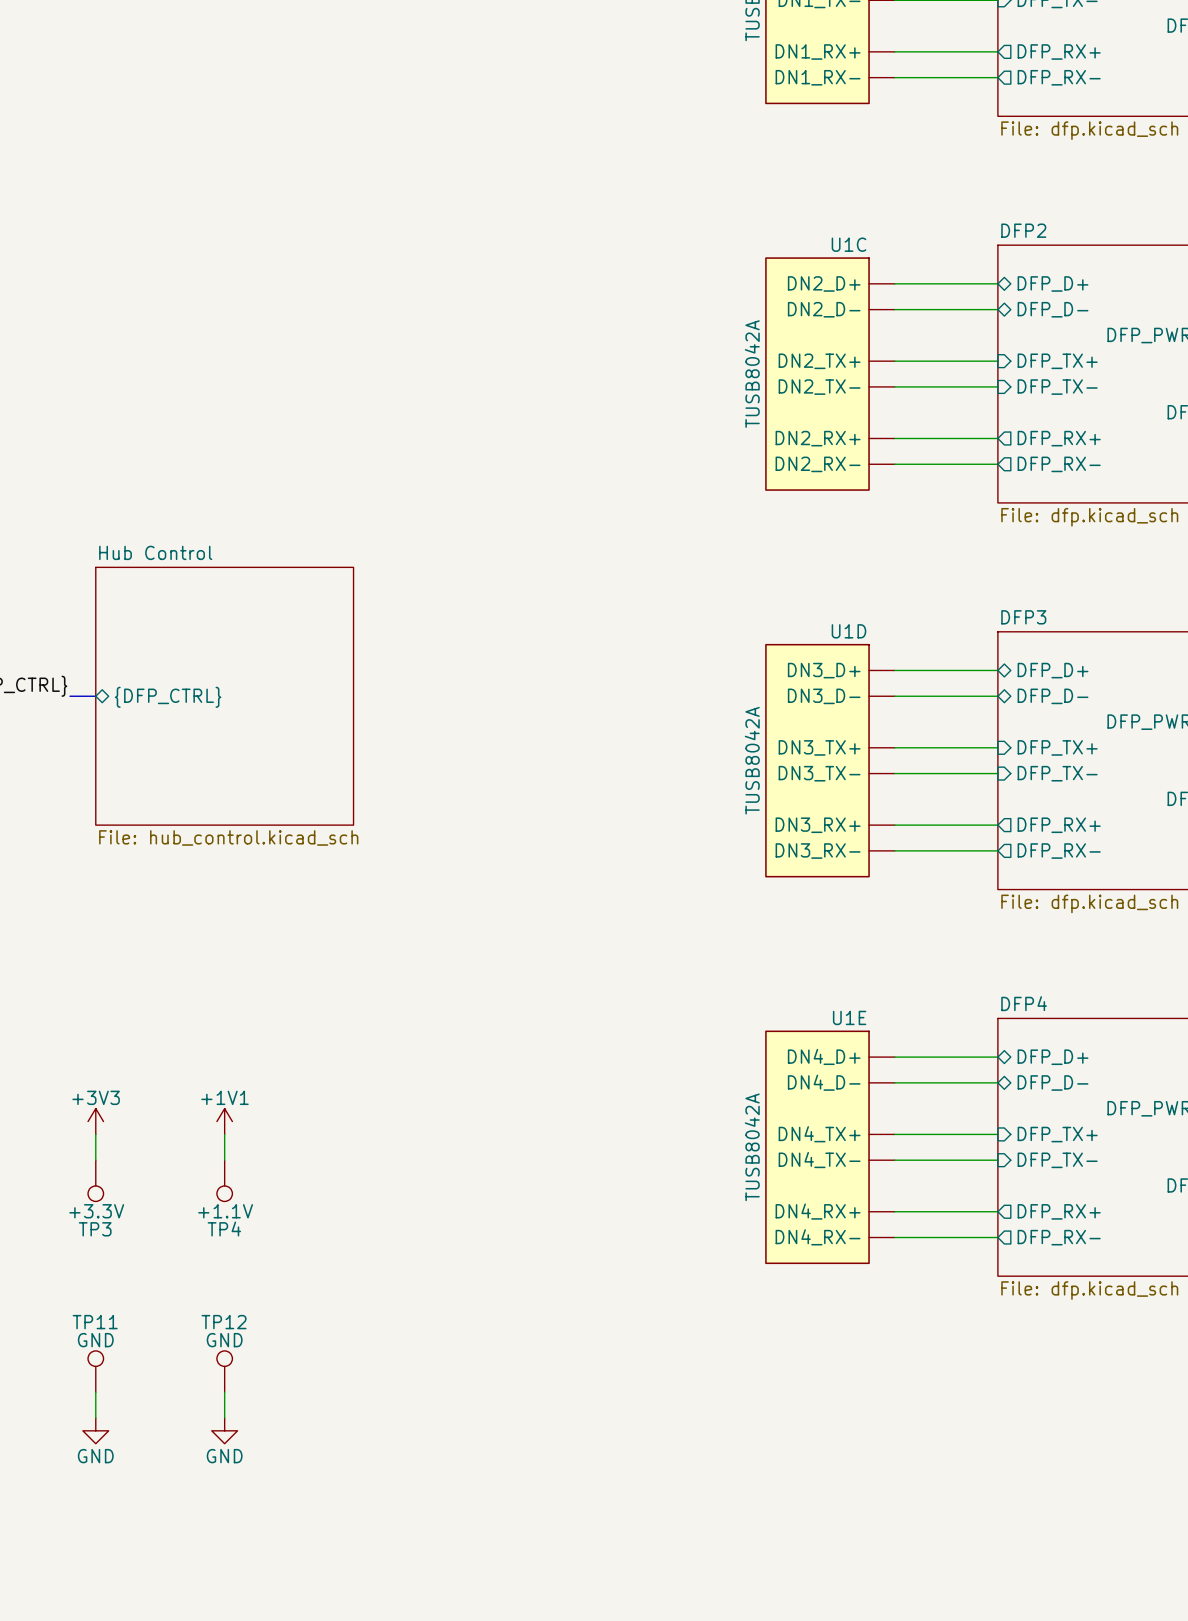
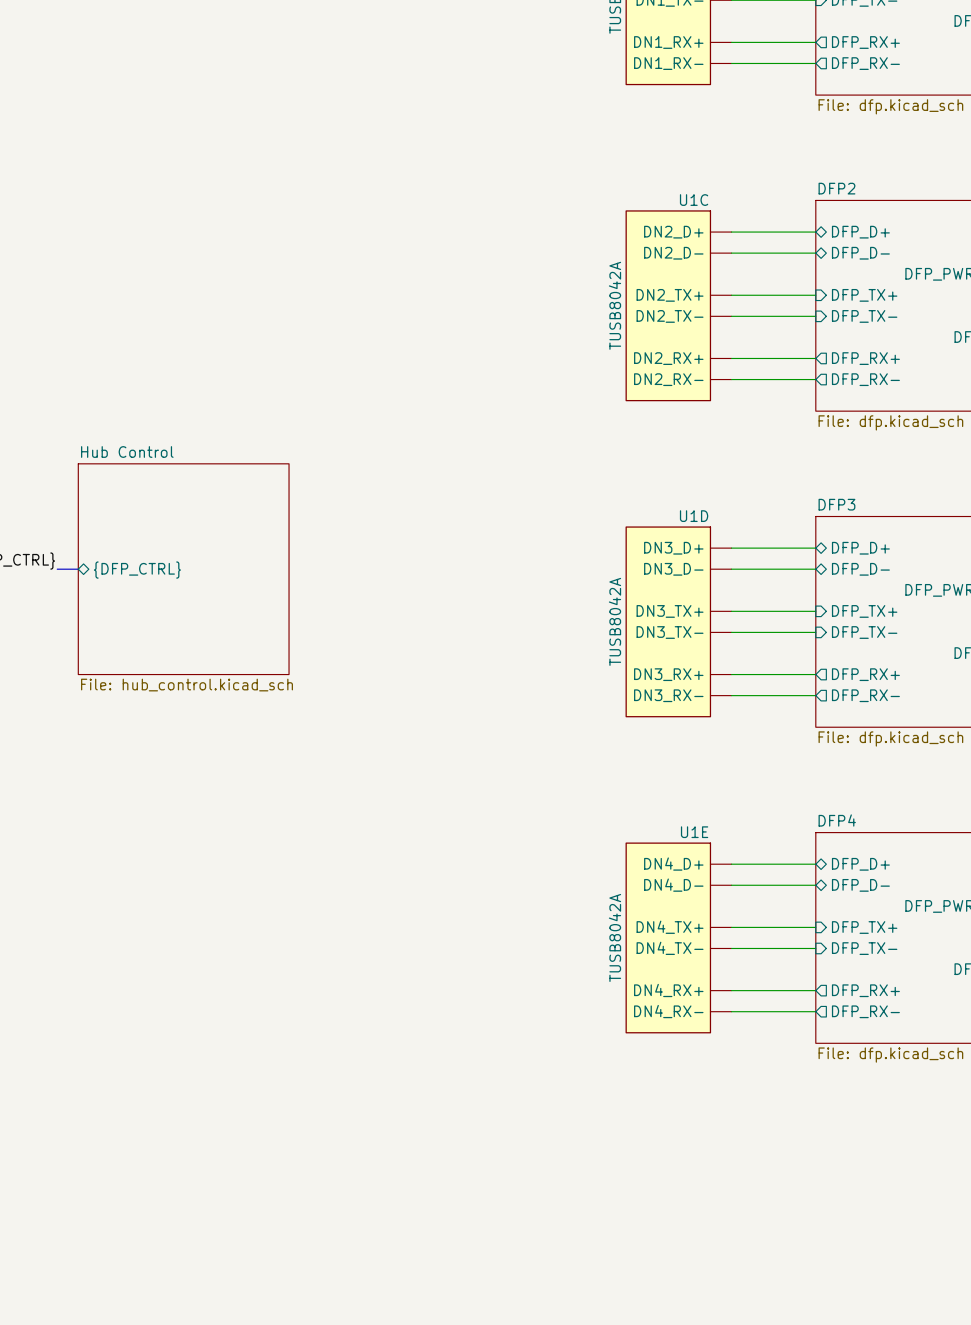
power symbol: +3V3 (95, 1121) -> none
power symbol: +1V1 (224, 1121) -> none
wire: (95, 1134) (95, 1160) -> none
wire: (224, 1134) (224, 1160) -> none
TP3: +3.3V (95, 1180) -> none
TP4: +1.1V (224, 1180) -> none
TP11: GND (95, 1371) -> none
TP12: GND (224, 1371) -> none
wire: (95, 1392) (95, 1417) -> none
wire: (224, 1392) (224, 1417) -> none
power symbol: GND (95, 1430) -> none
power symbol: GND (224, 1430) -> none

